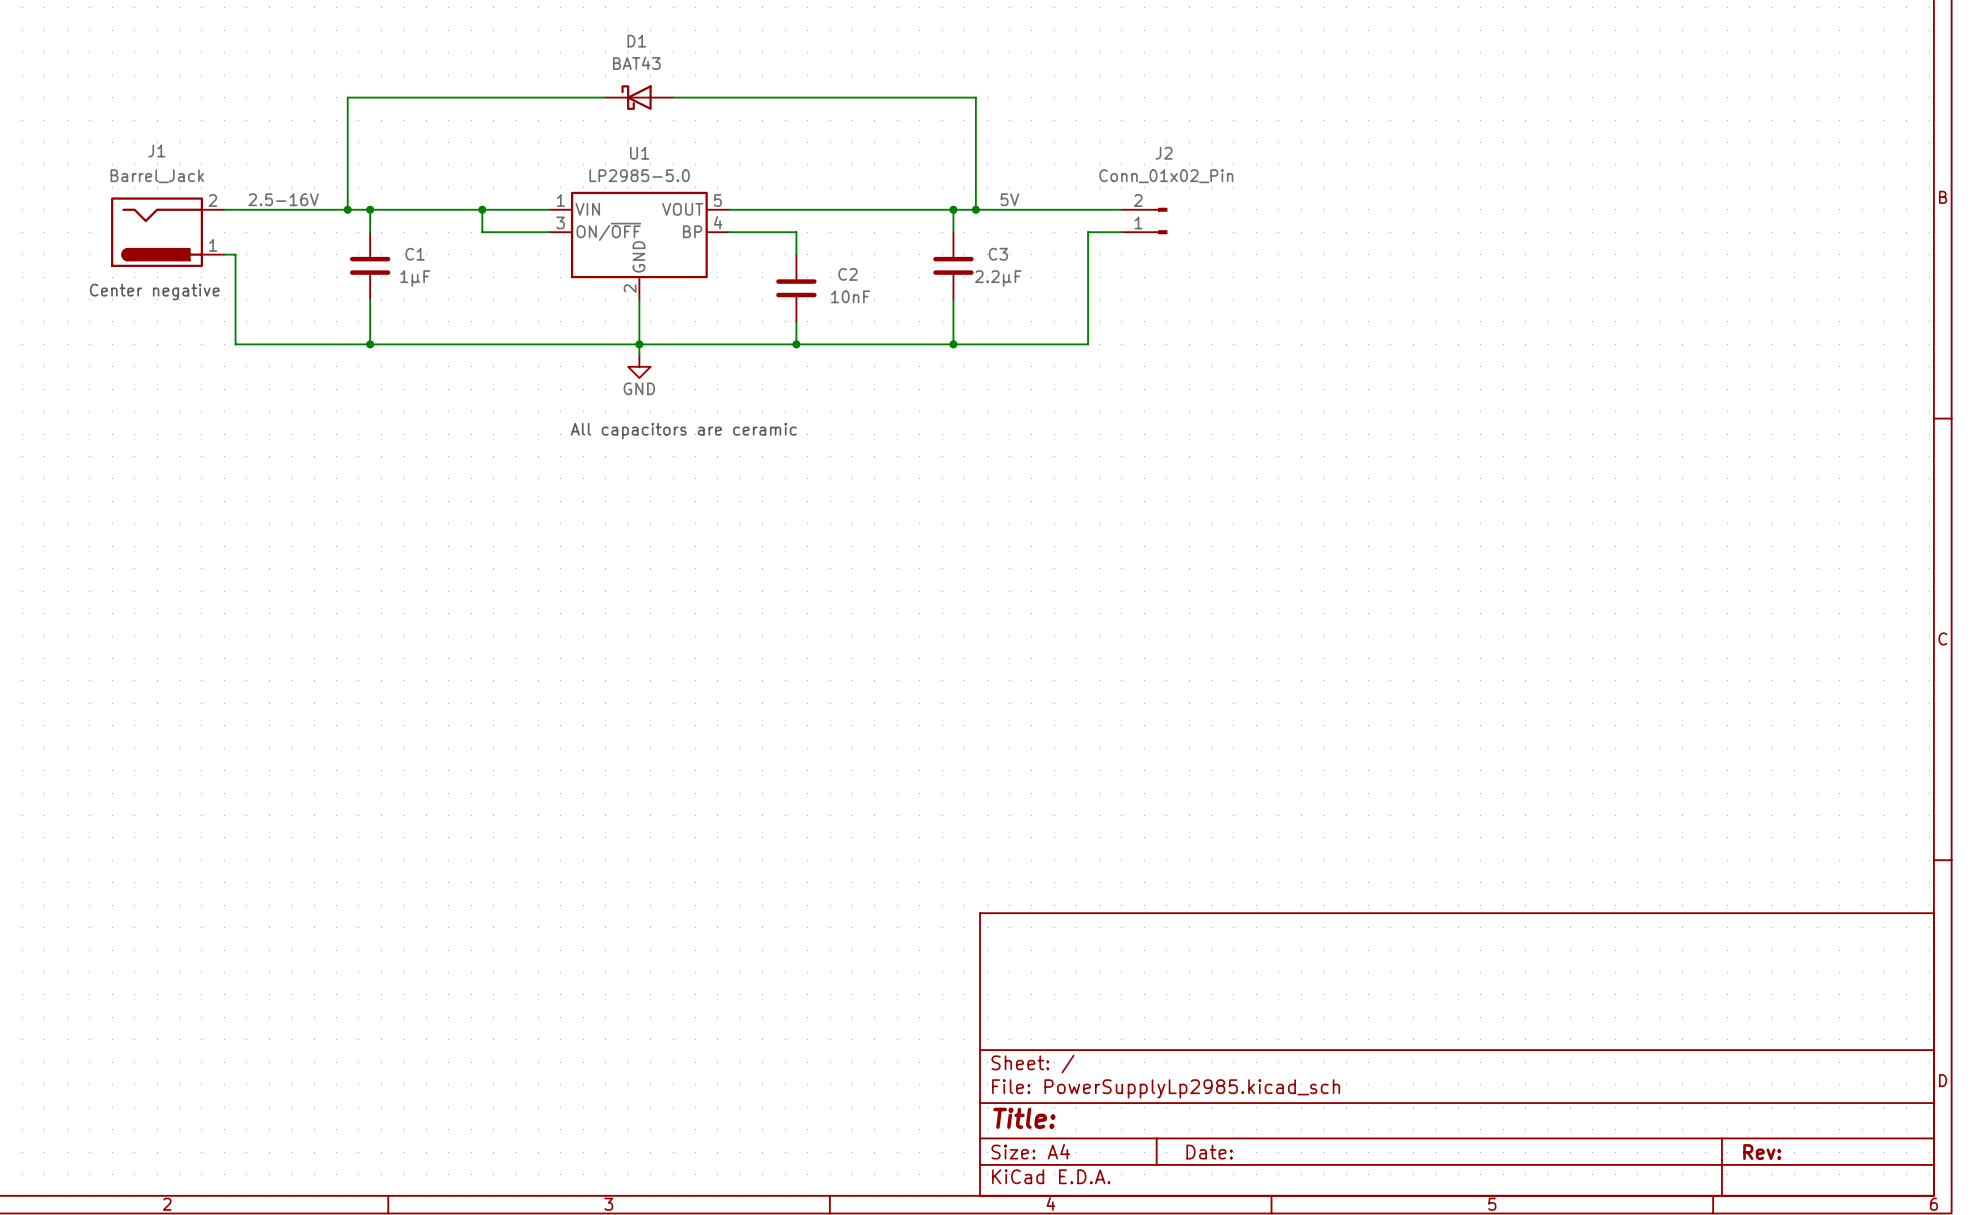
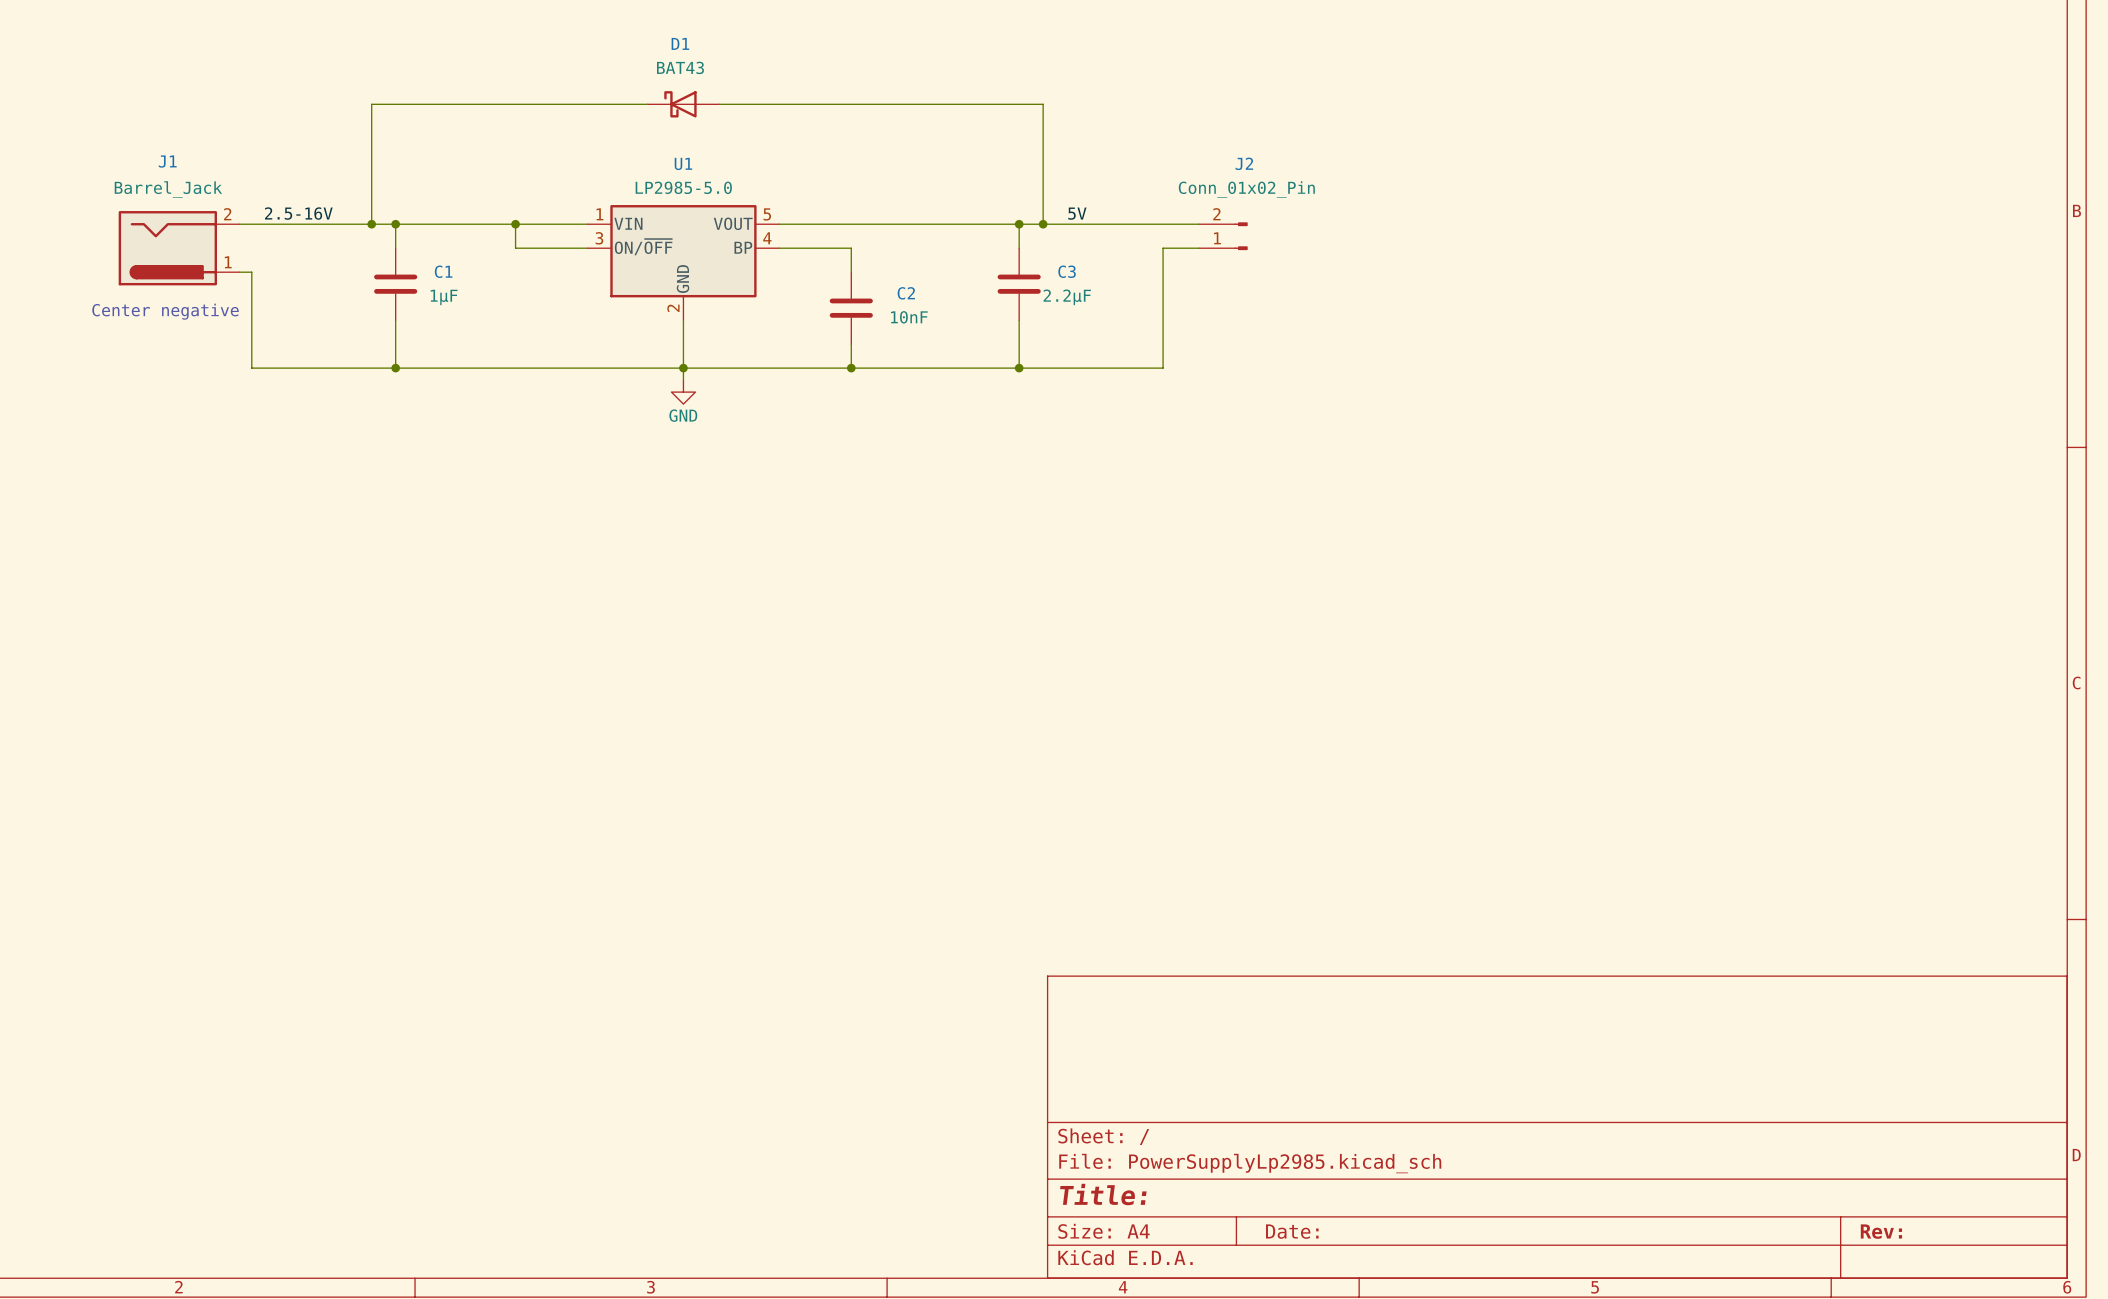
text: All capacitors are ceramic (683, 431) -> none

